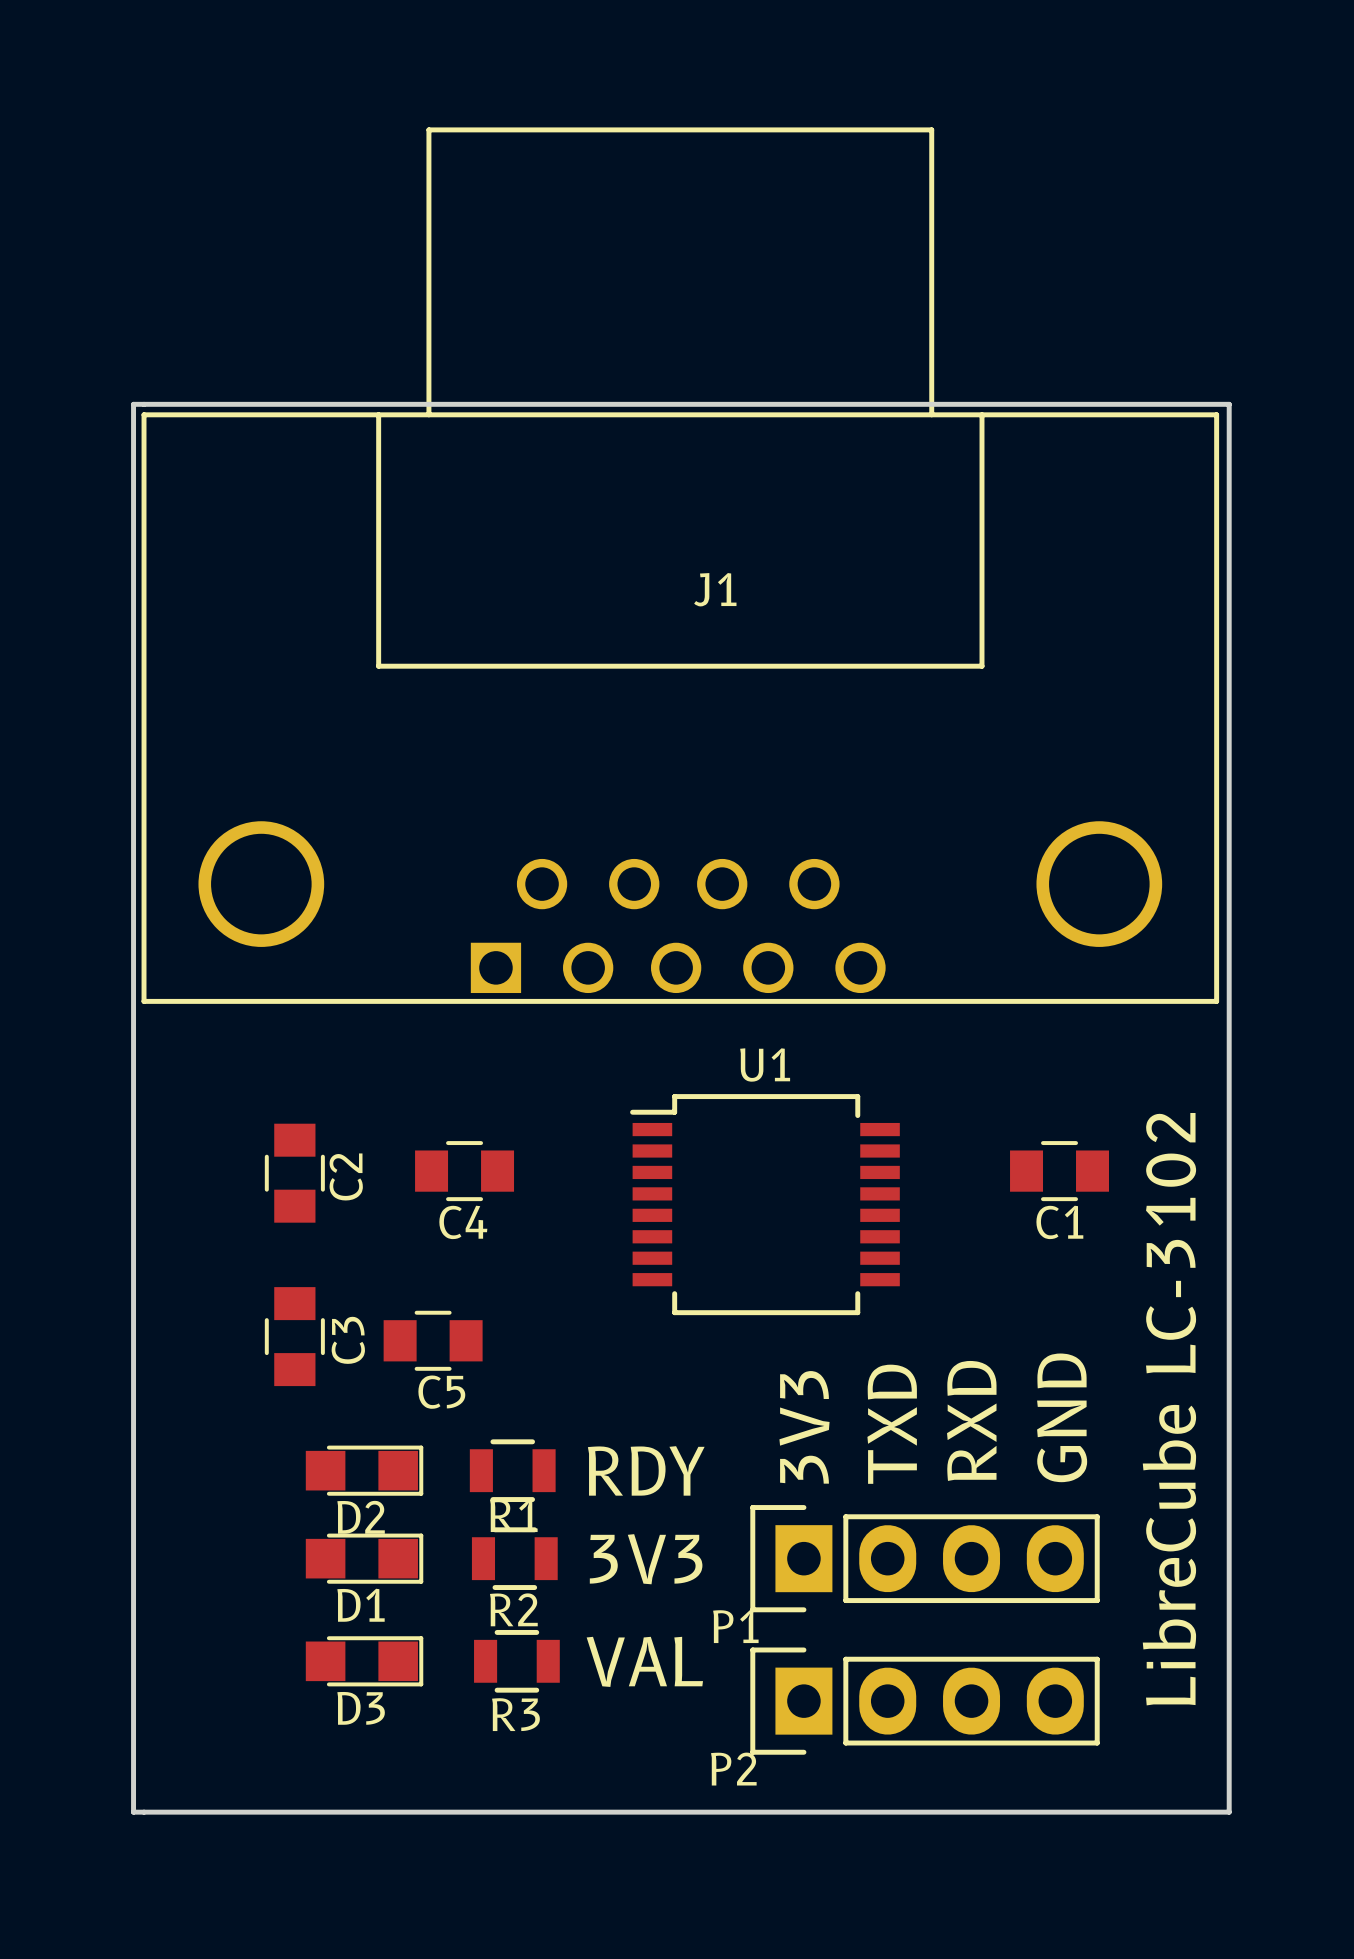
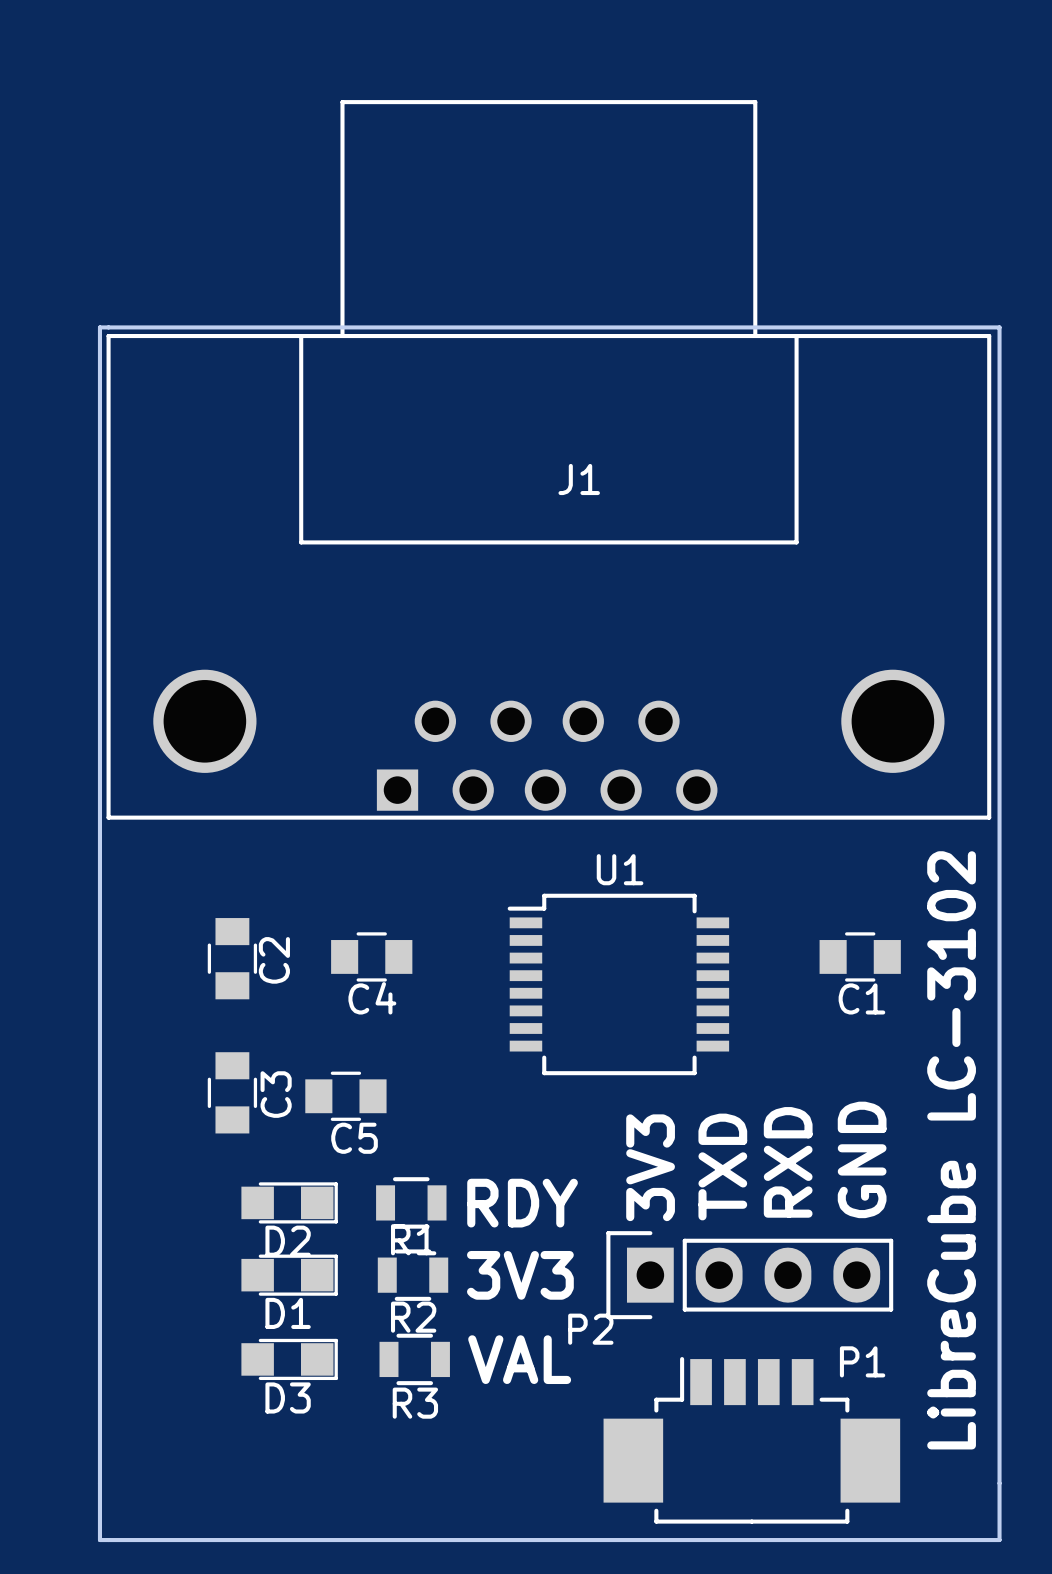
P1 name position: P1 (735, 1626) -> P1 (862, 1361)
P1 footprint: [750, 1647, 1100, 1755] -> [603, 1357, 901, 1524]
P2 name position: P2 (733, 1769) -> P2 (590, 1329)
board edge: (133, 1812) (1229, 1812) -> (99, 1483) (99, 1540) (999, 1540) (999, 1483)

